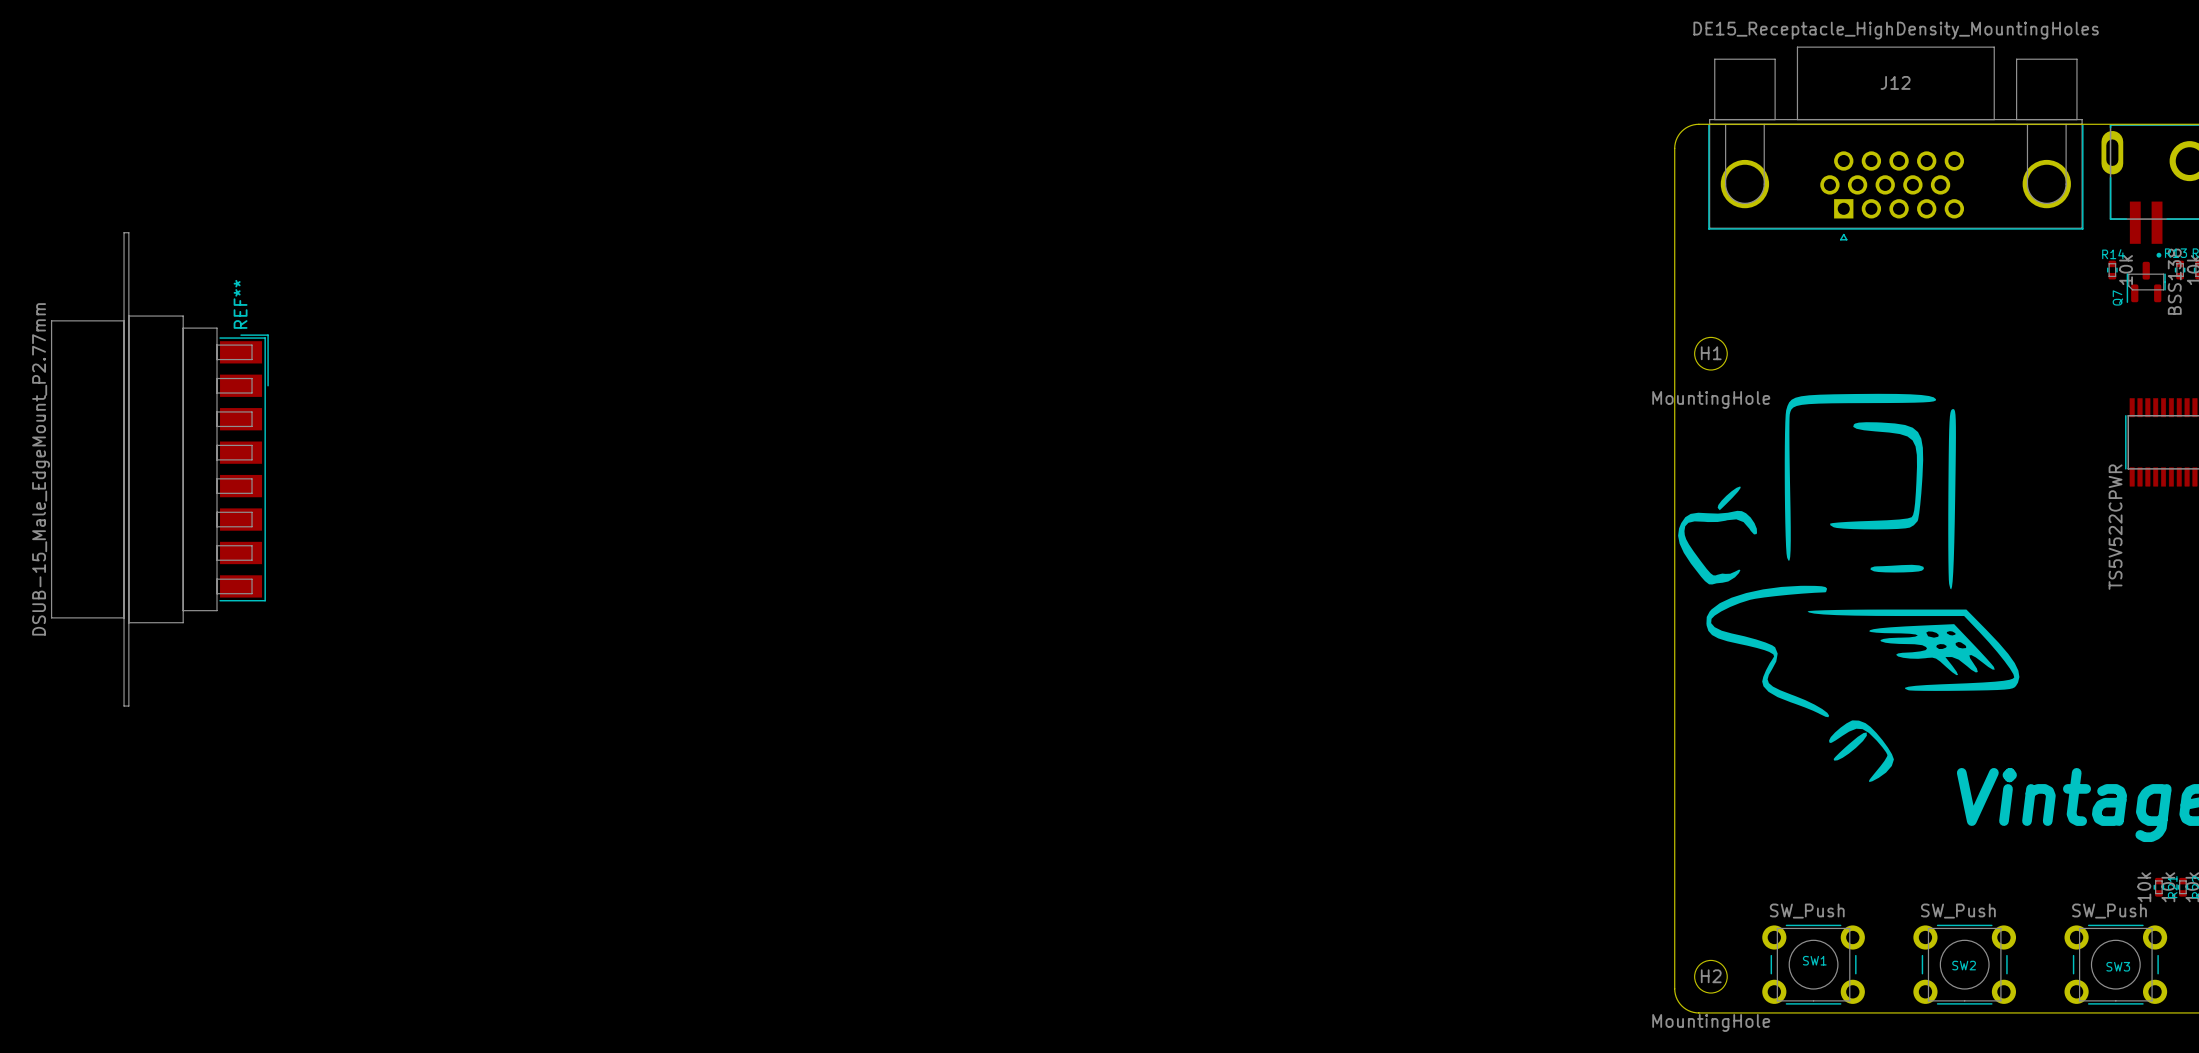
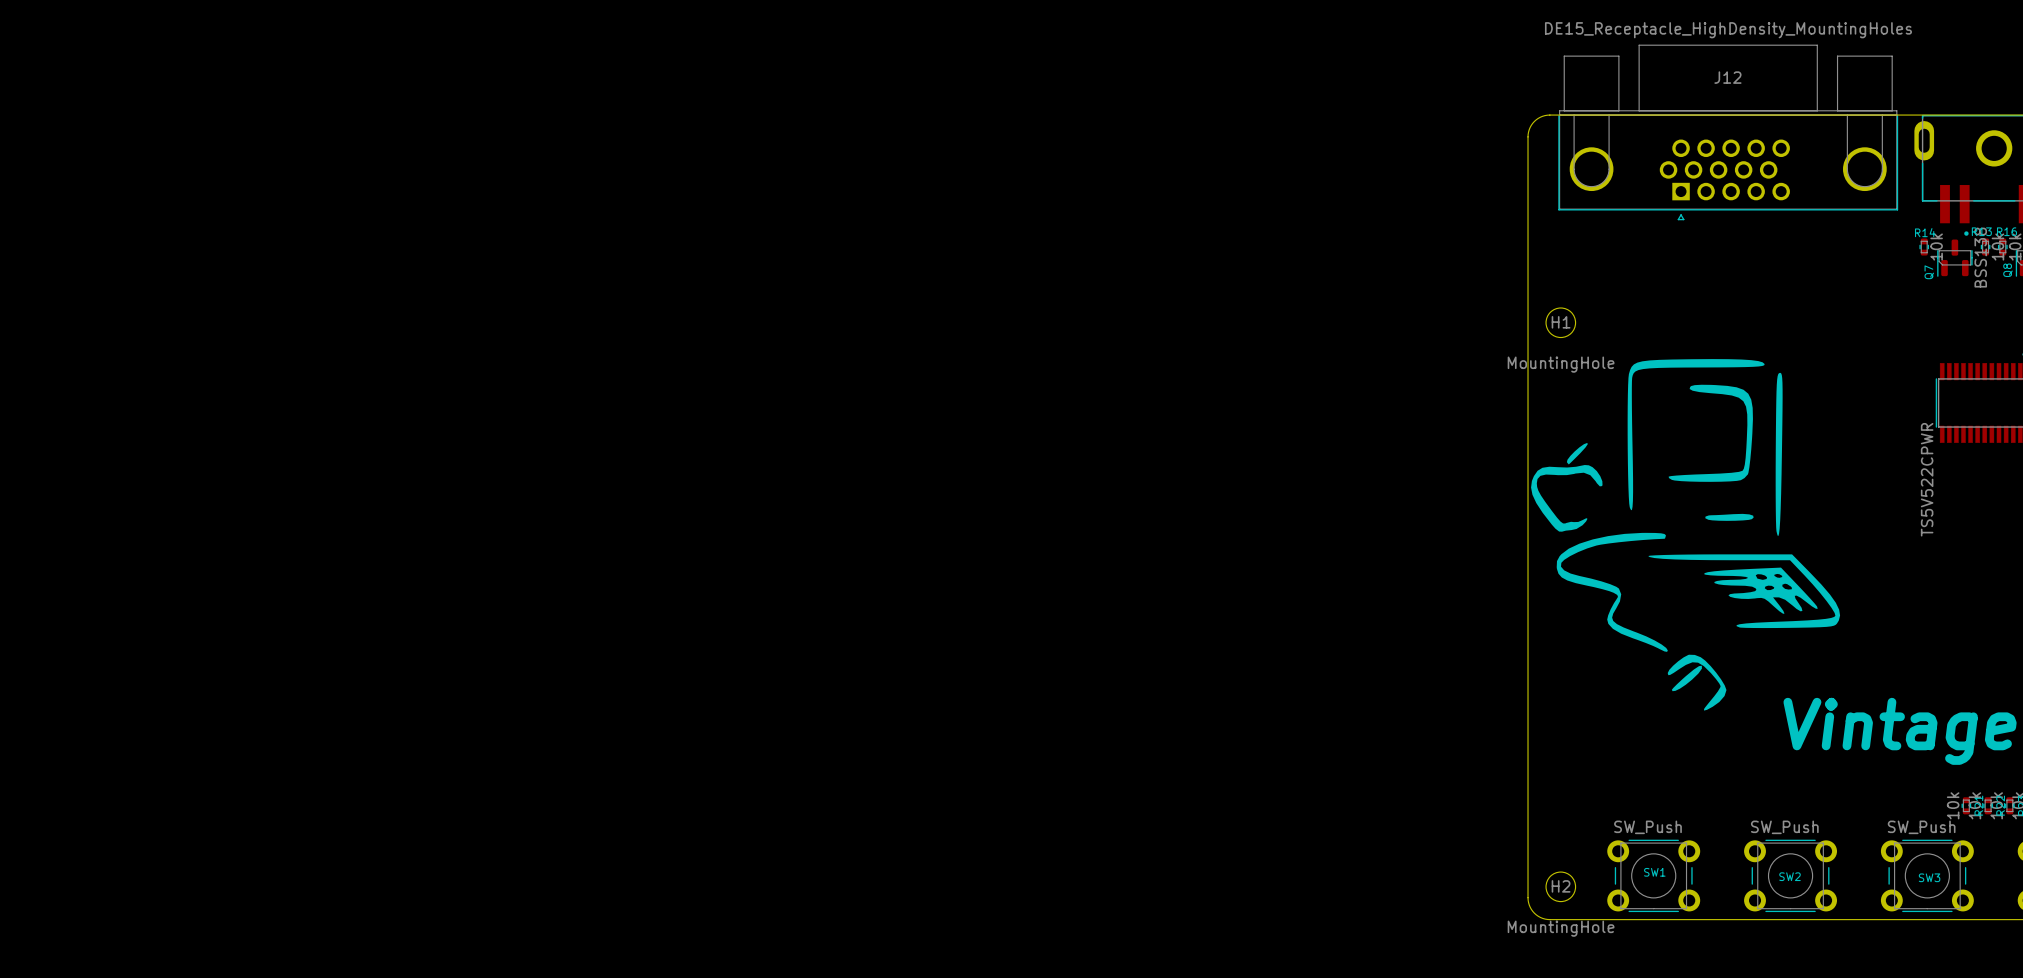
REF**: DSUB-15_Male_EdgeMount_P2.77mm (159, 469) -> none

